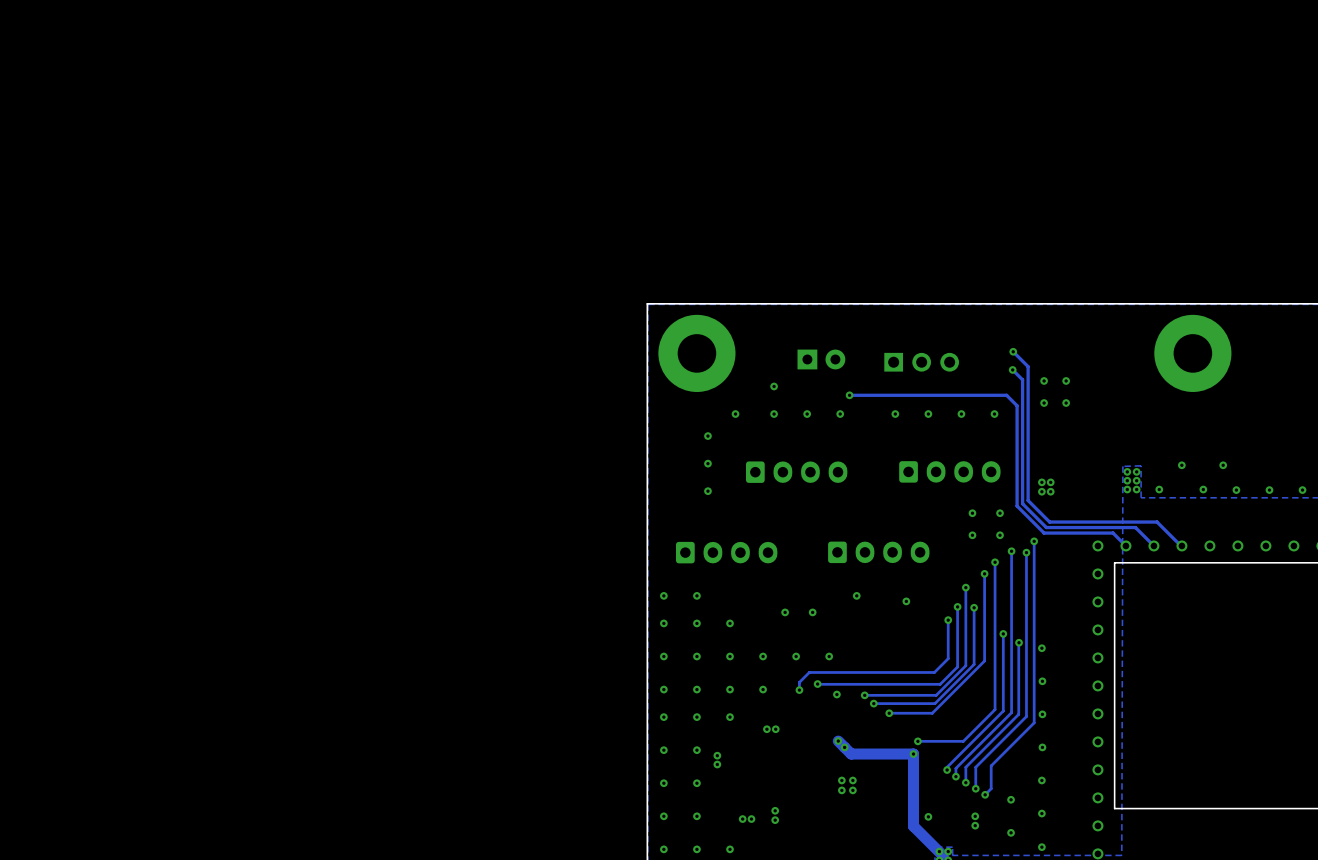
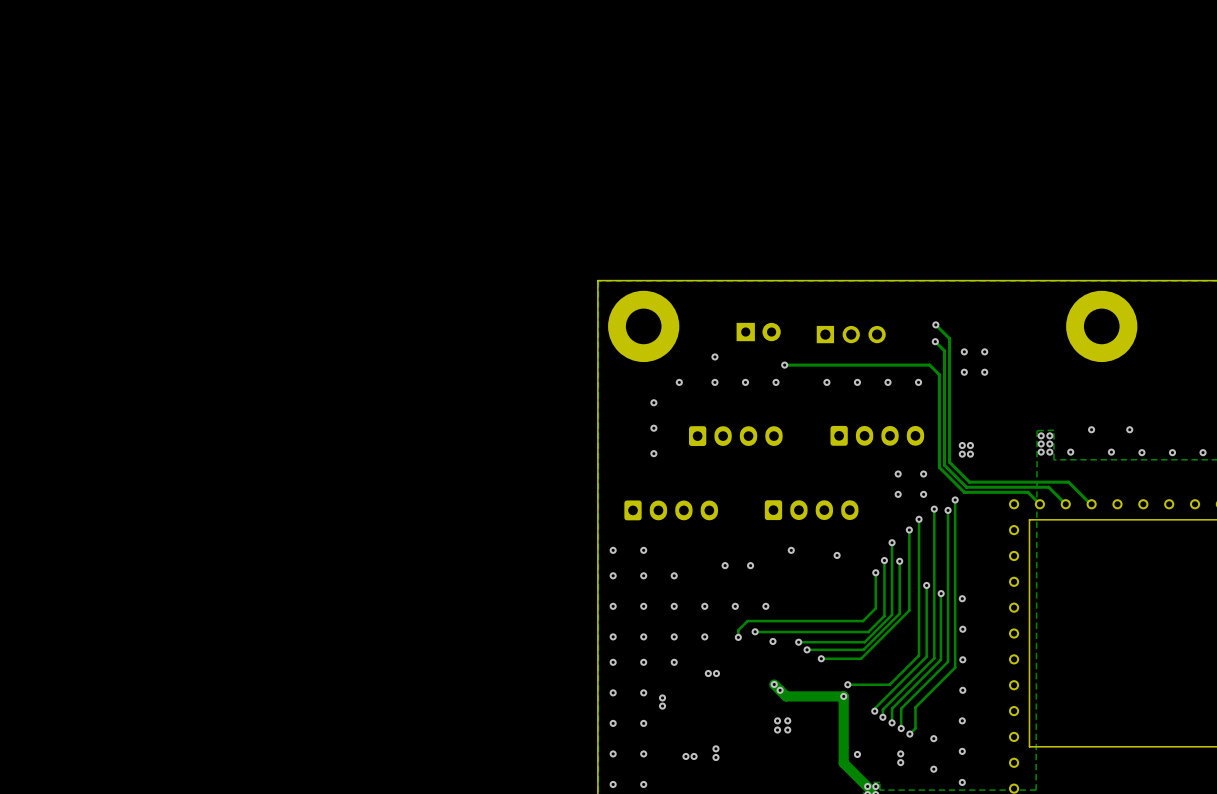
via: (730, 849) -> none

